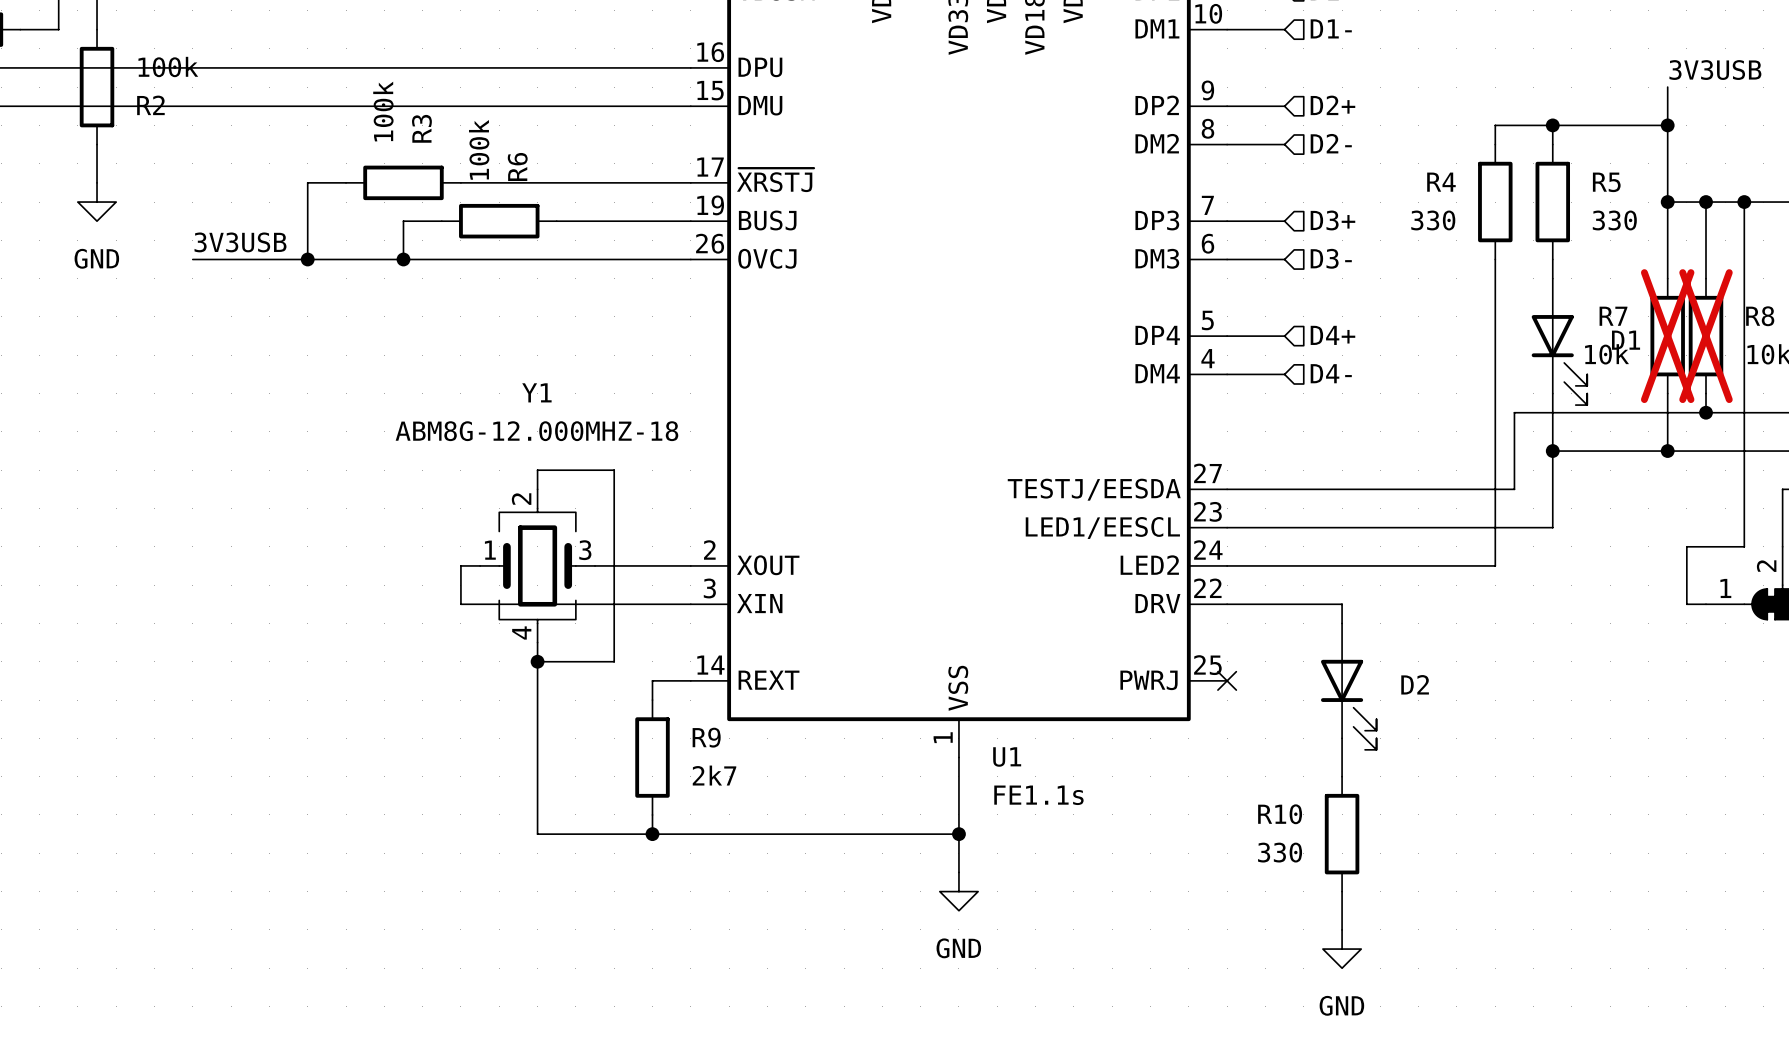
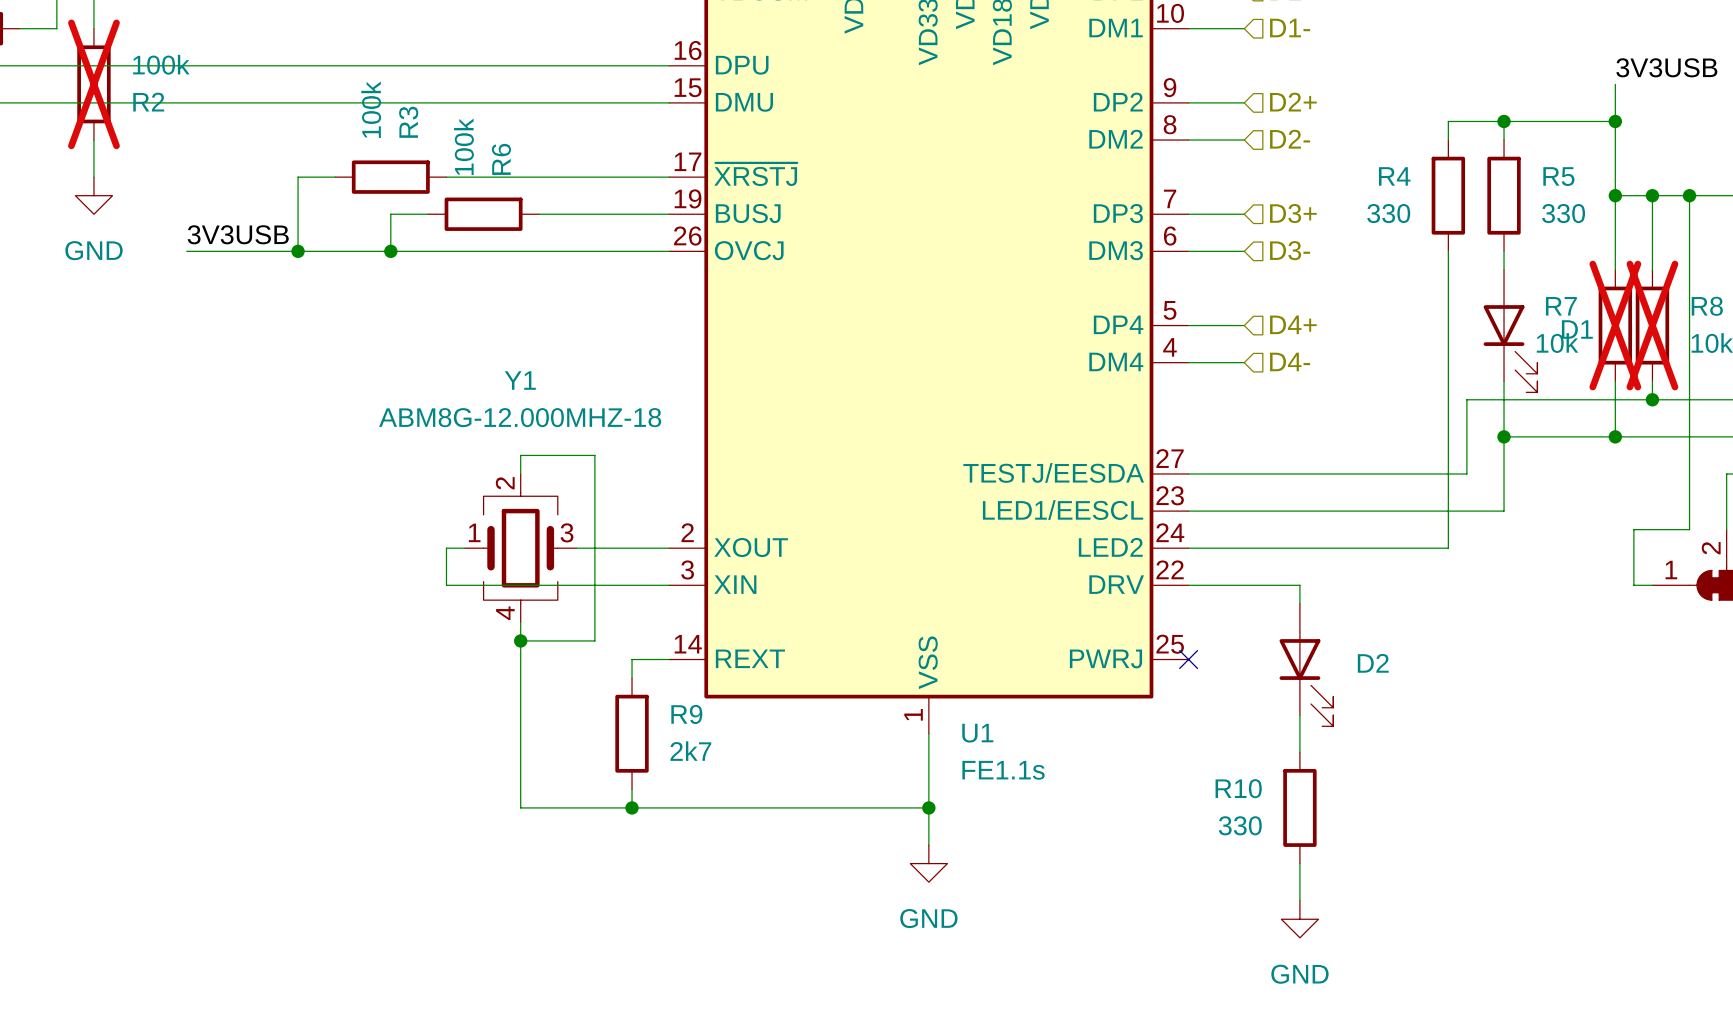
R2 do-not-place cross: none -> (93, 84)

